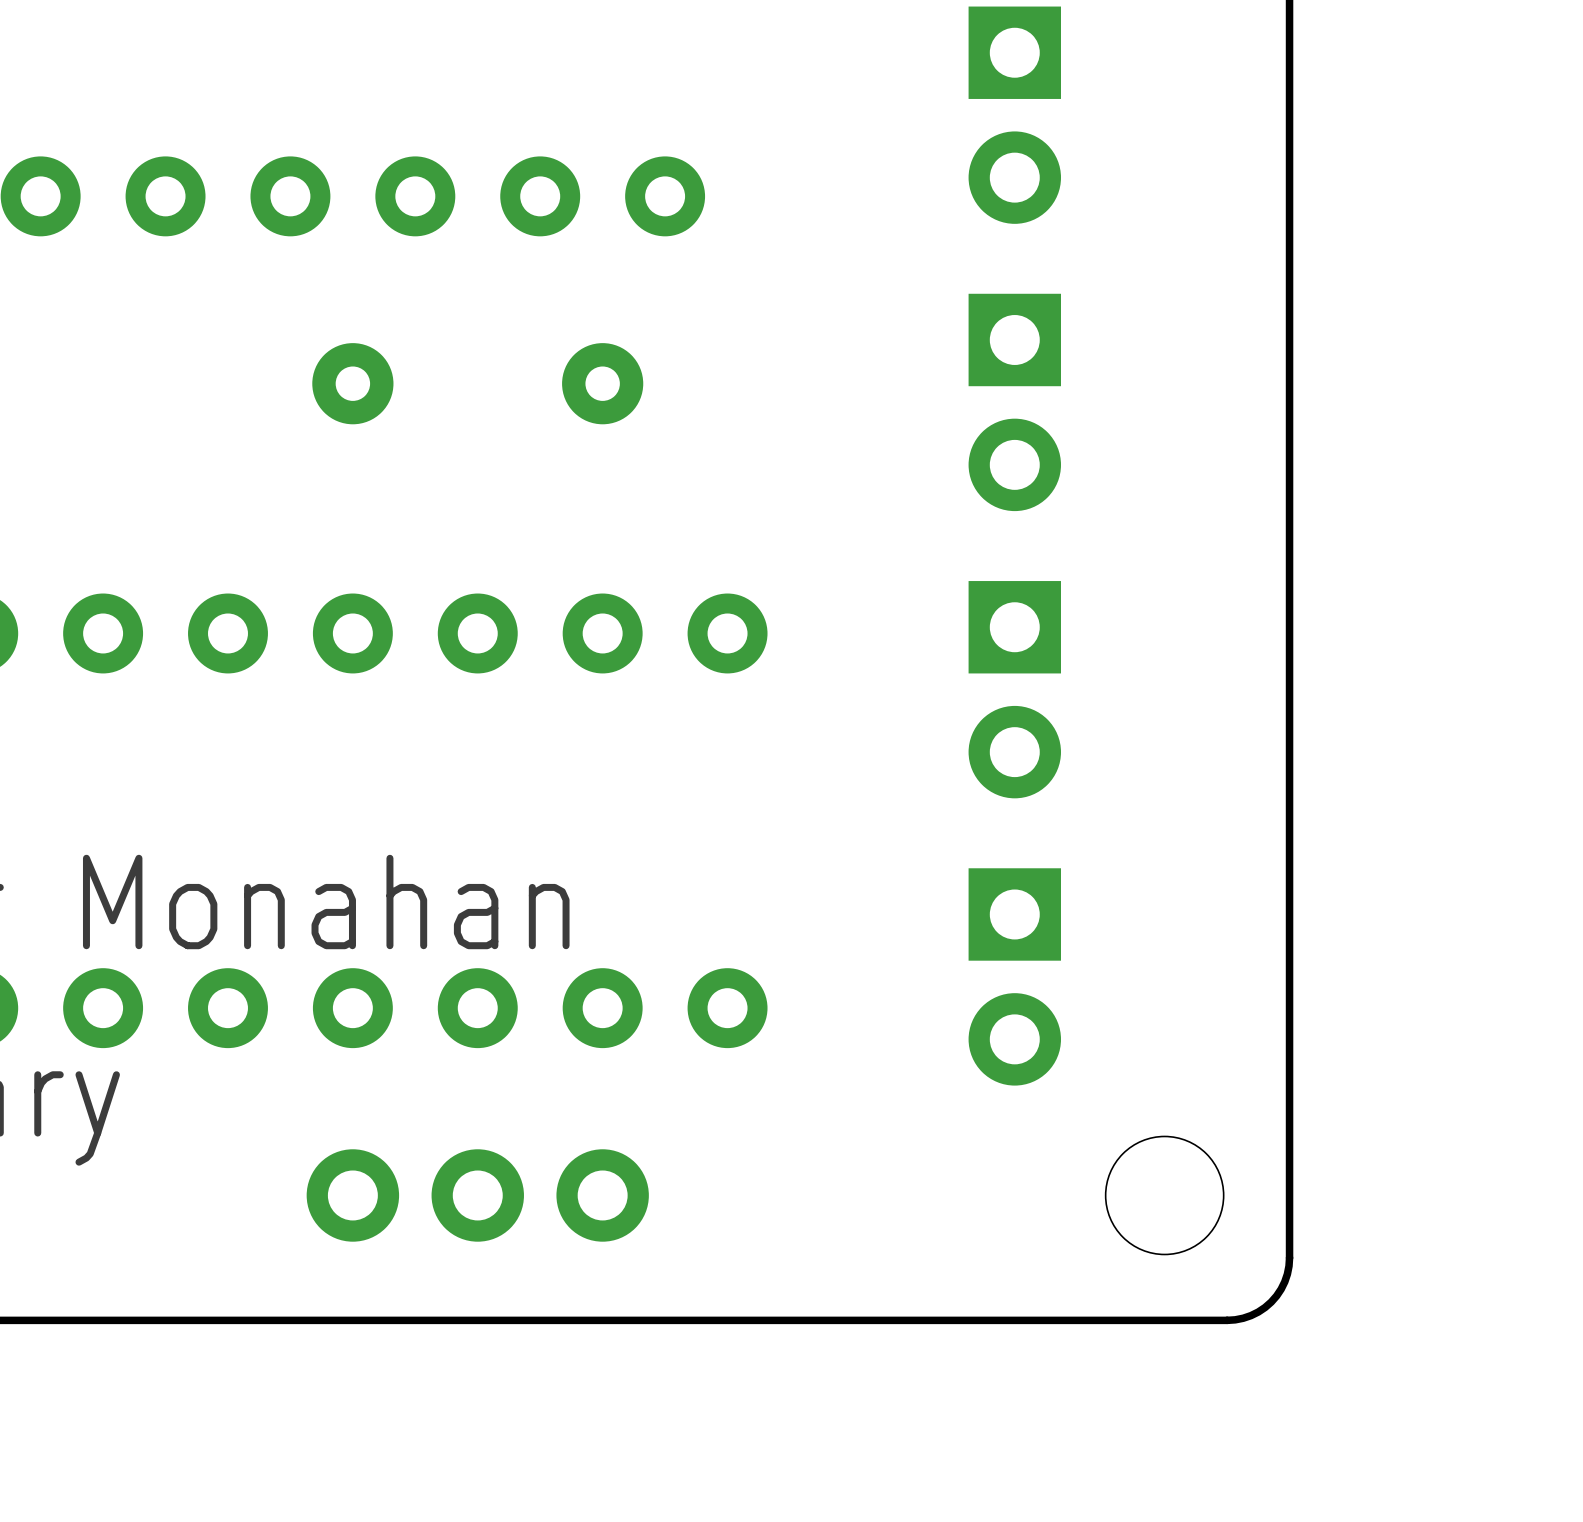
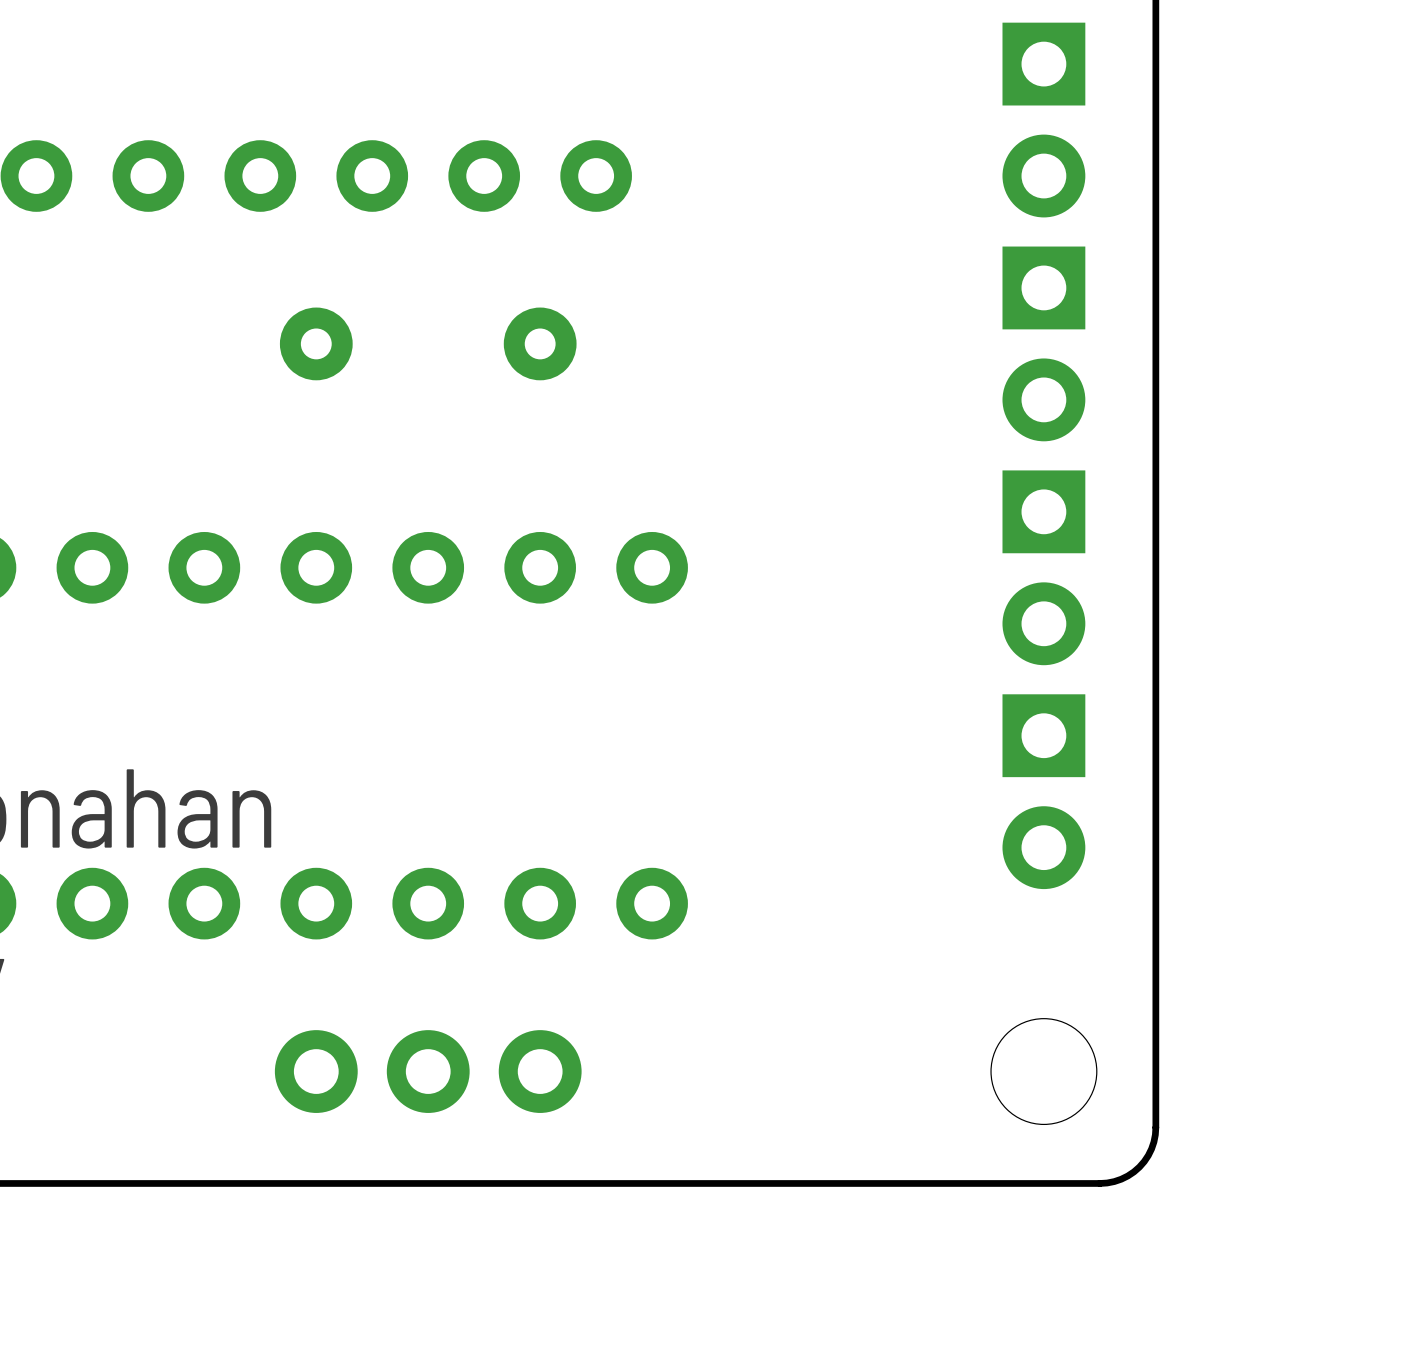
part: (1014, 115) -> none
part: none -> (1043, 120)
part: none -> (1043, 343)
part: (1014, 402) -> none
part: none -> (1043, 567)
part: (1014, 689) -> none
part: none -> (1043, 791)
part: (1014, 976) -> none

